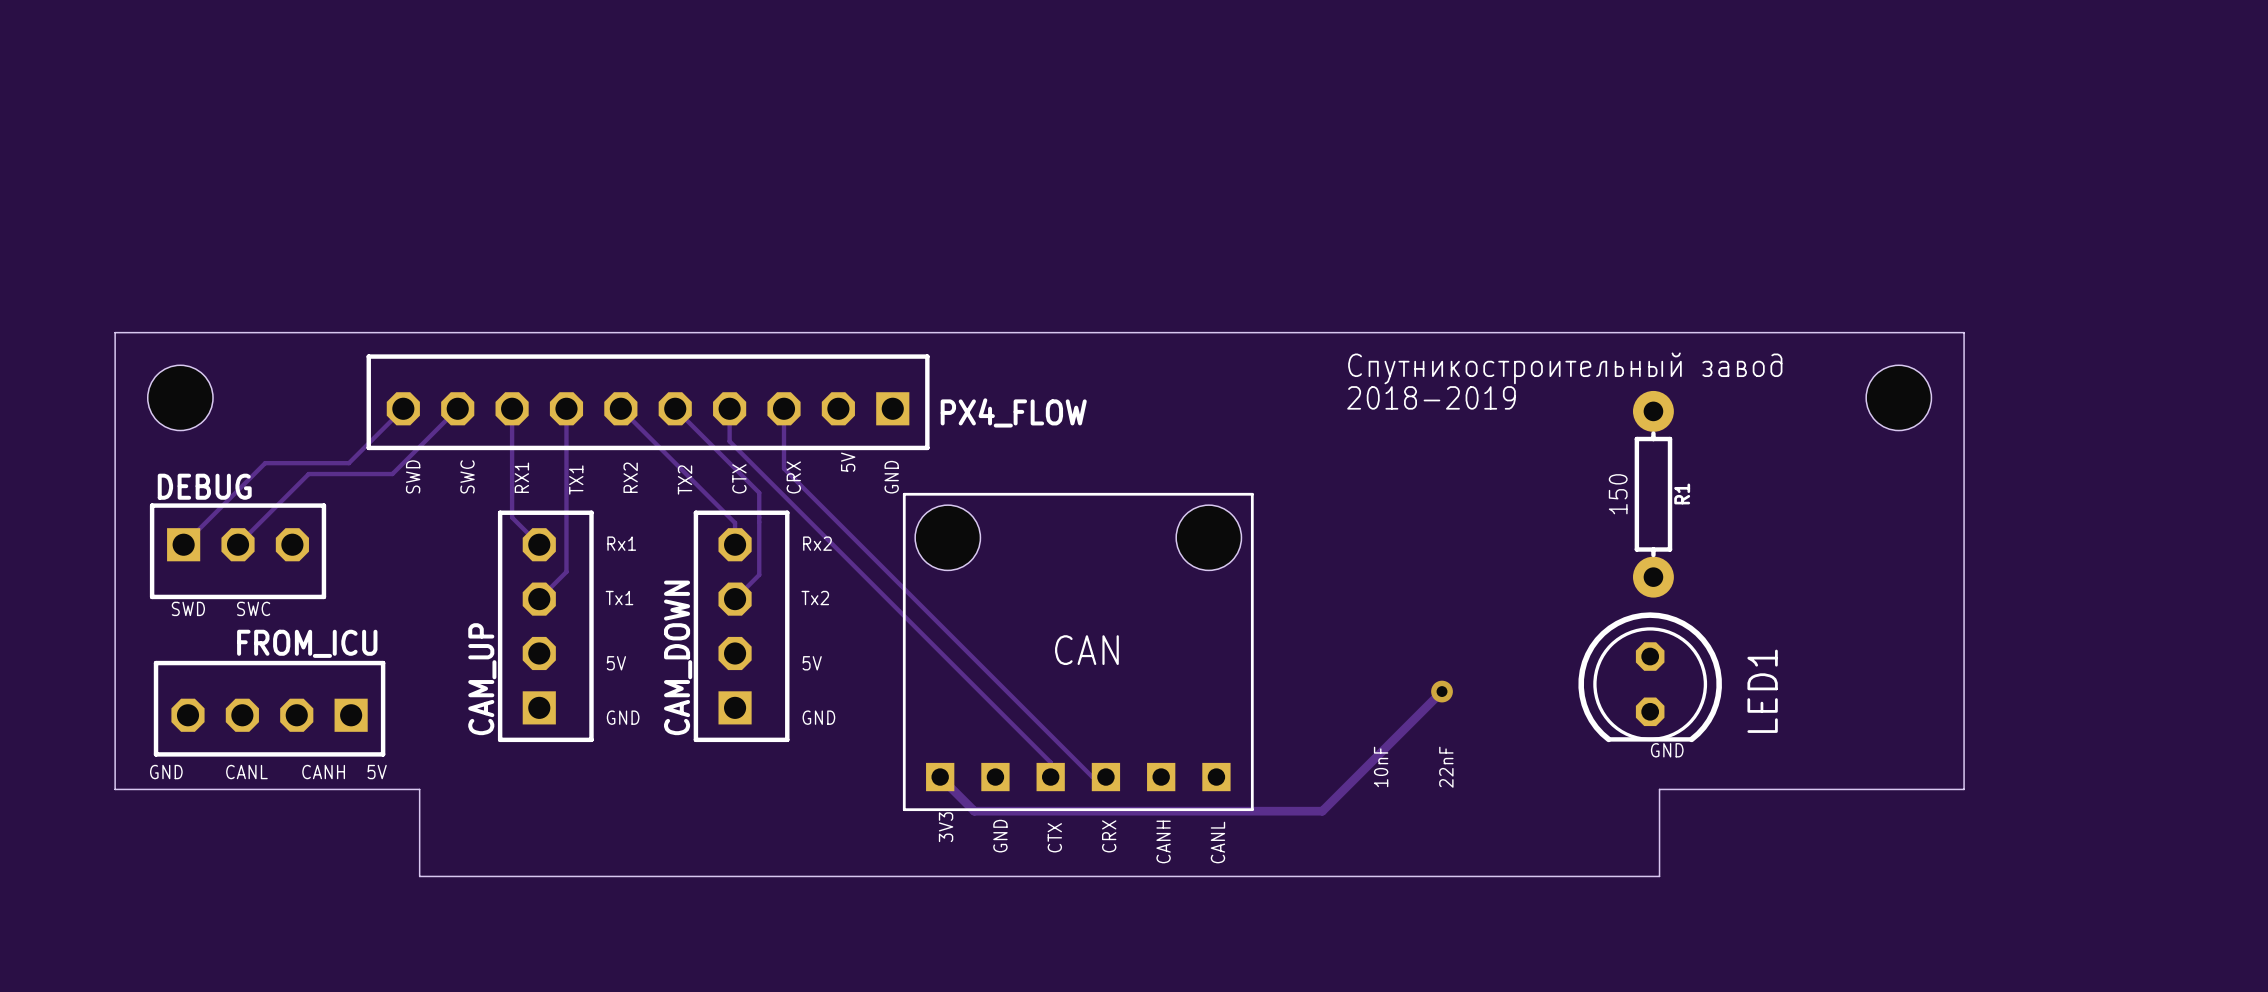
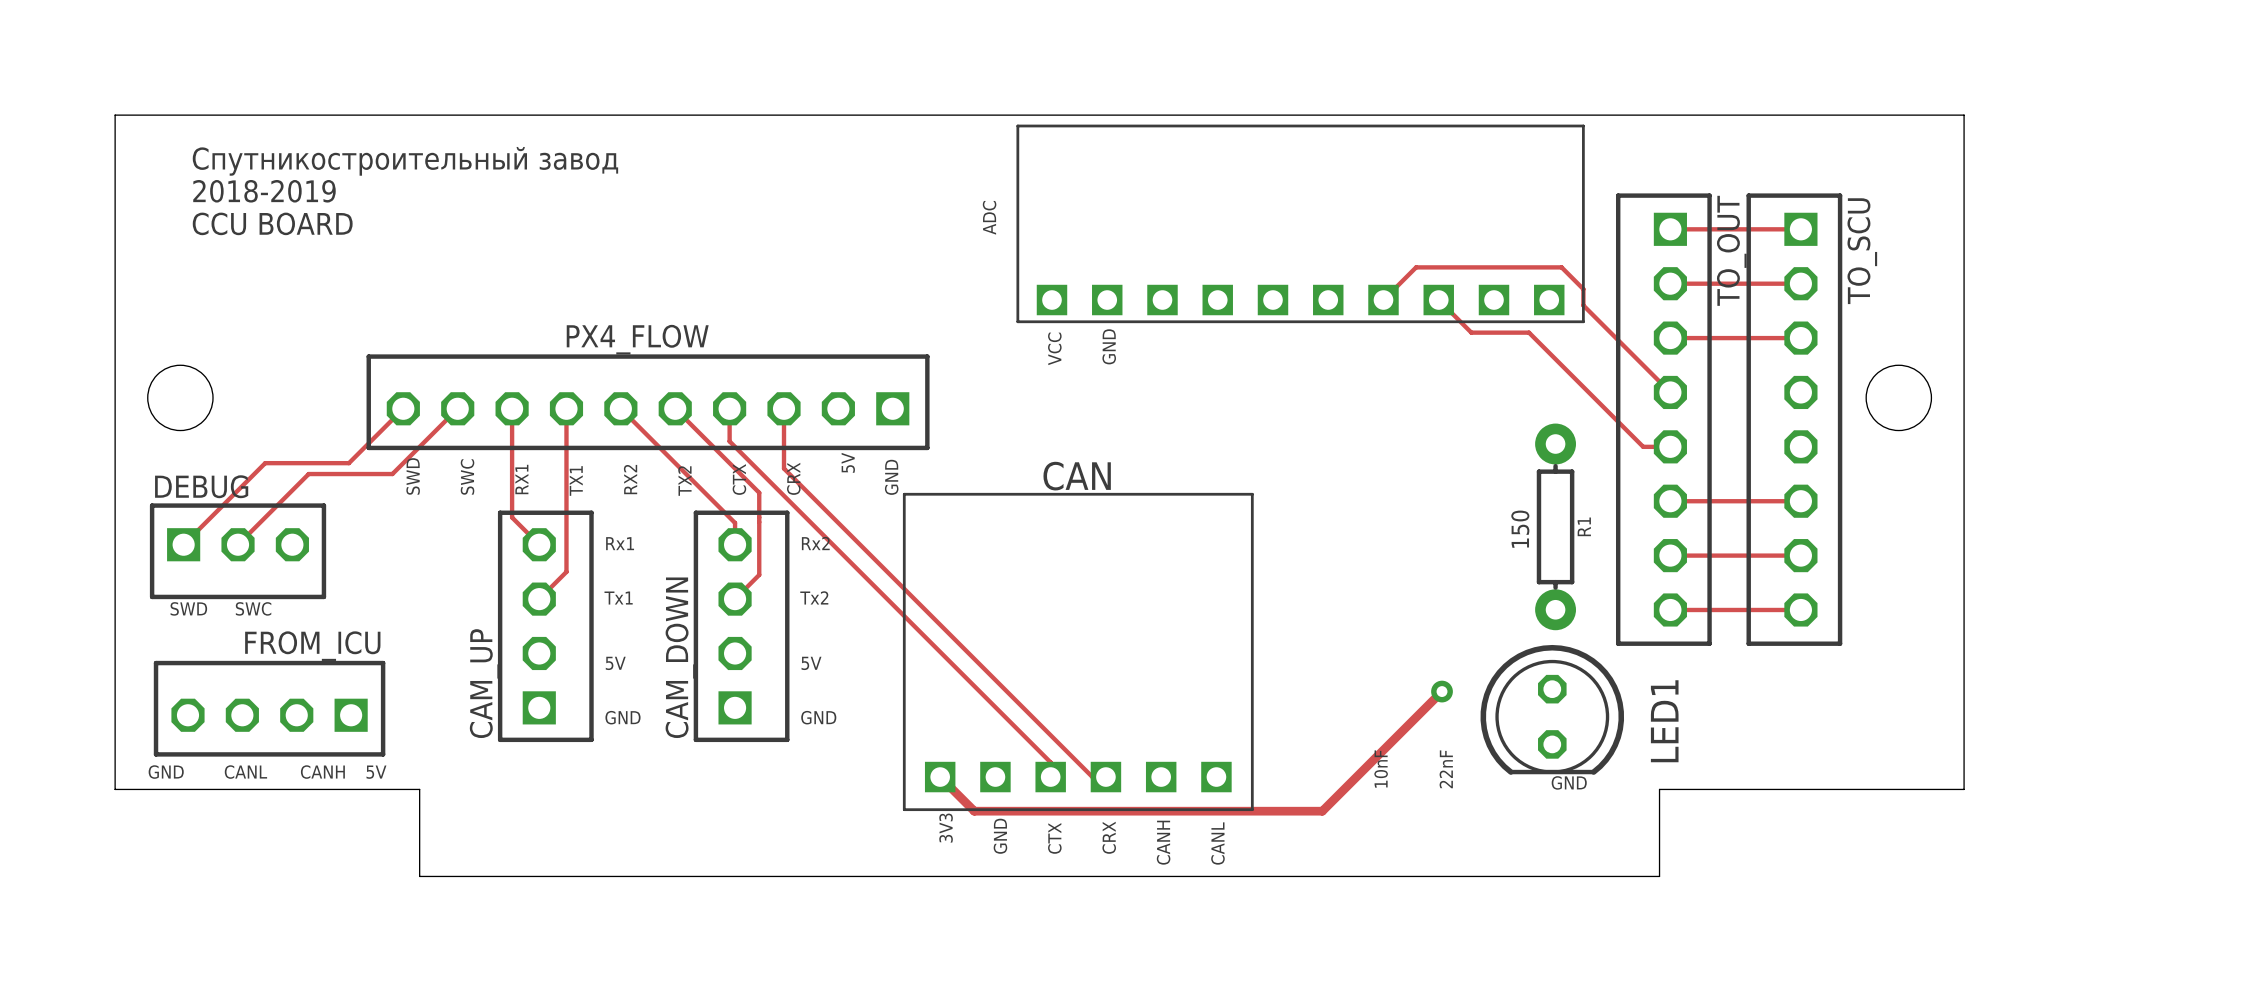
text: none -> Спутникостроительный завод (405, 161)
text: none -> 2018-2019 (264, 191)
text: none -> ADC (989, 217)
text: none -> CCU BOARD (272, 223)
part: none -> (1300, 223)
track: none -> (1670, 229) (1800, 229)
track: none -> (1670, 283) (1800, 283)
track: none -> (1383, 300) (1416, 267) (1561, 267) (1583, 289) (1583, 305) (1670, 392)
track: none -> (1438, 300) (1471, 332) (1529, 332) (1643, 446) (1670, 446)
board edge: (115, 332) (1964, 332) -> (115, 332) (115, 115) (1964, 115) (1964, 332)
track: none -> (1670, 338) (1800, 338)
text: none -> GND (1109, 346)
text: none -> VCC (1054, 348)
text: Спутникостроительный завод (1565, 368) -> none
text: 2018-2019 (1431, 397) -> none
PX4_FLOW name position: PX4_FLOW (1013, 412) -> PX4_FLOW (637, 339)
TO_OUT: none -> (1663, 419)
TO_SCU: none -> (1794, 419)
CAN footprint: [902, 492, 1254, 812] -> [902, 492, 1254, 812]
text position: 150 (1618, 494) -> 150 (1520, 529)
R1 position: (1653, 494) -> (1555, 526)
track: none -> (1670, 501) (1800, 501)
track: none -> (1670, 555) (1800, 555)
track: none -> (1670, 609) (1800, 609)
CAN name position: CAN (1086, 650) -> CAN (1077, 476)
LED1 position: (1650, 677) -> (1552, 709)
text position: GND (1667, 750) -> GND (1569, 782)

